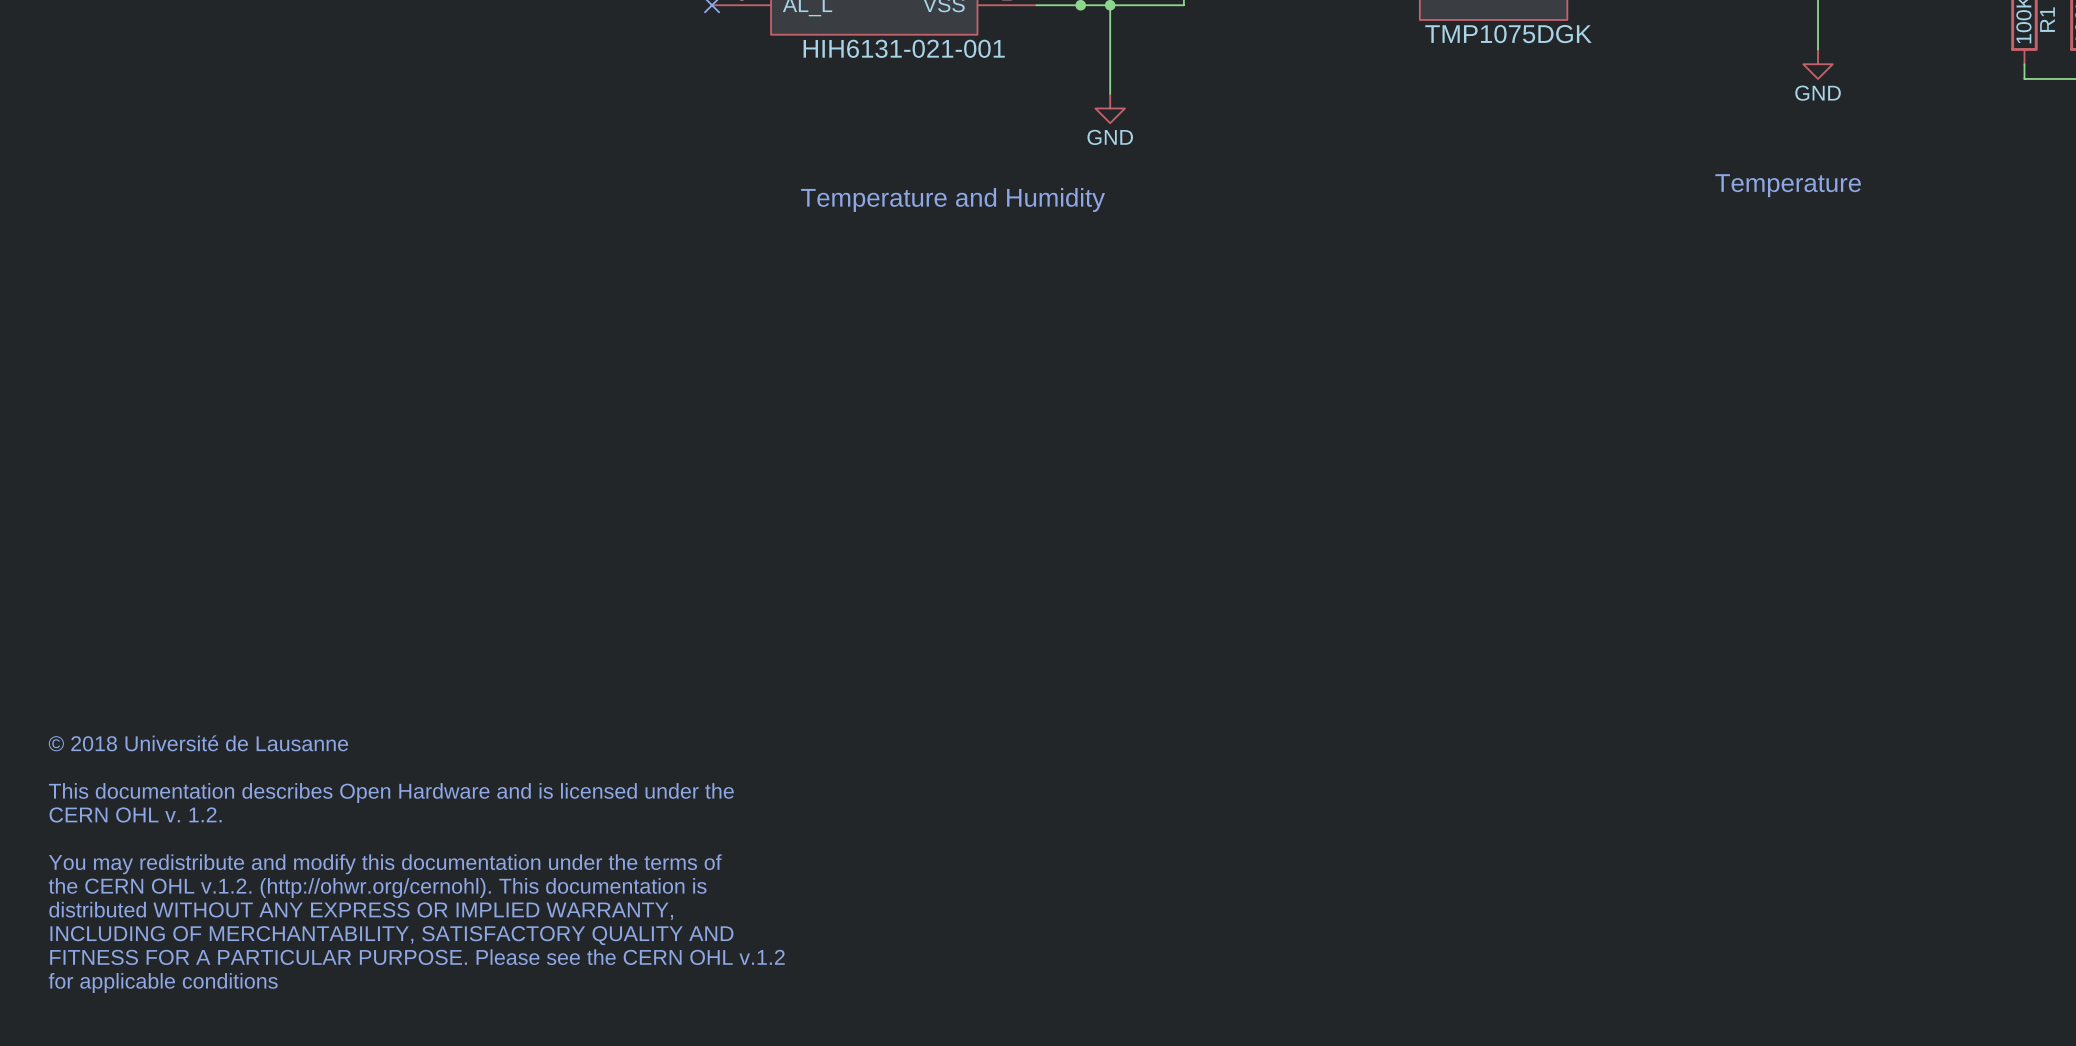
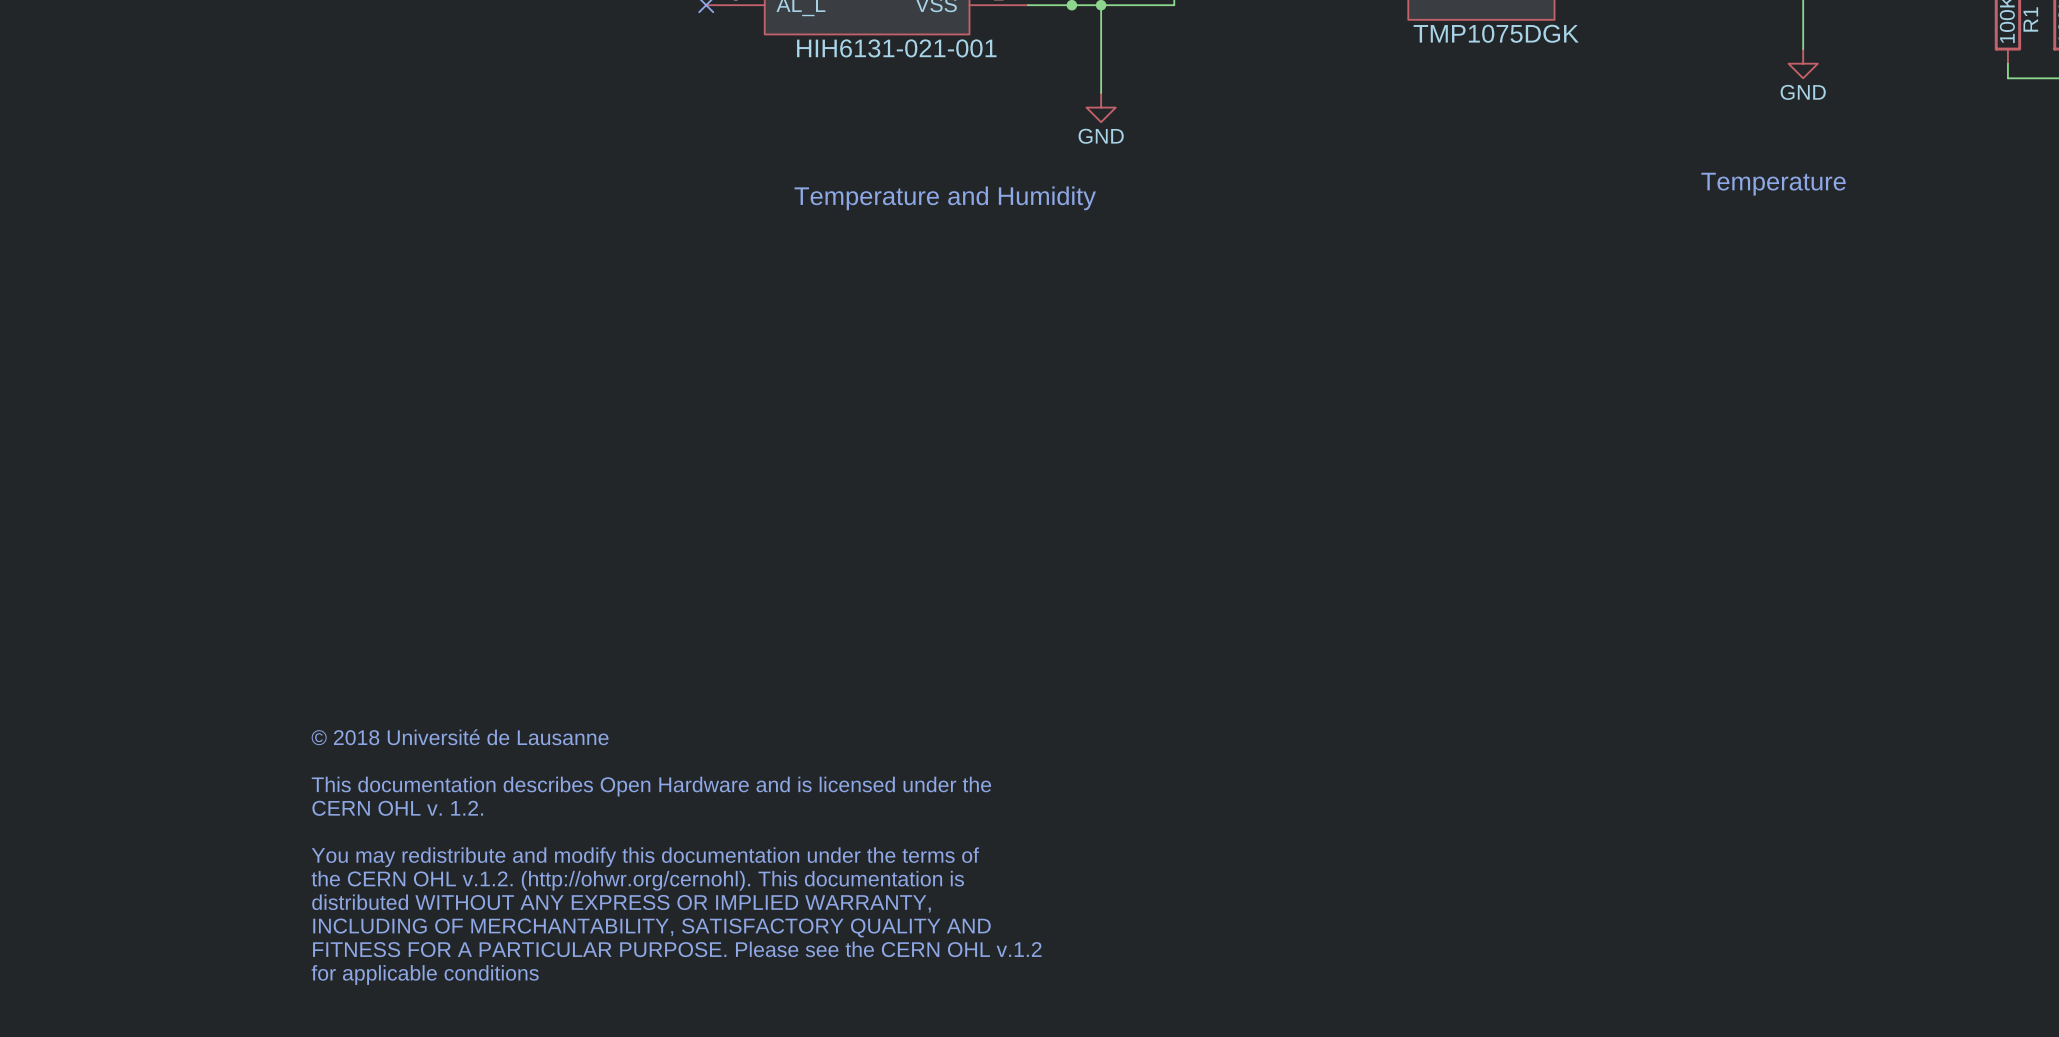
text position: © 2018 Université de Lausanne (198, 743) -> © 2018 Université de Lausanne (460, 737)
text position: This documentation describes Open Hardware and is licensed under the (391, 793) -> This documentation describes Open Hardware and is licensed under the (651, 786)
text position: CERN OHL v. 1.2. (135, 814) -> CERN OHL v. 1.2. (397, 808)
text position: You may redistribute and modify this documentation under the terms of (385, 864) -> You may redistribute and modify this documentation under the terms of (645, 857)
text position: the CERN OHL v.1.2. (http://ohwr.org/cernohl). This documentation is (377, 888) -> the CERN OHL v.1.2. (http://ohwr.org/cernohl). This documentation is (637, 880)
text position: distributed WITHOUT ANY EXPRESS OR IMPLIED WARRANTY, (361, 910) -> distributed WITHOUT ANY EXPRESS OR IMPLIED WARRANTY, (621, 903)
text position: INCLUDING OF MERCHANTABILITY, SATISFACTORY QUALITY AND (391, 935) -> INCLUDING OF MERCHANTABILITY, SATISFACTORY QUALITY AND (651, 927)
text position: FITNESS FOR A PARTICULAR PURPOSE. Please see the CERN OHL v.1.2 (417, 957) -> FITNESS FOR A PARTICULAR PURPOSE. Please see the CERN OHL v.1.2 (677, 949)
text position: for applicable conditions (163, 982) -> for applicable conditions (425, 974)

